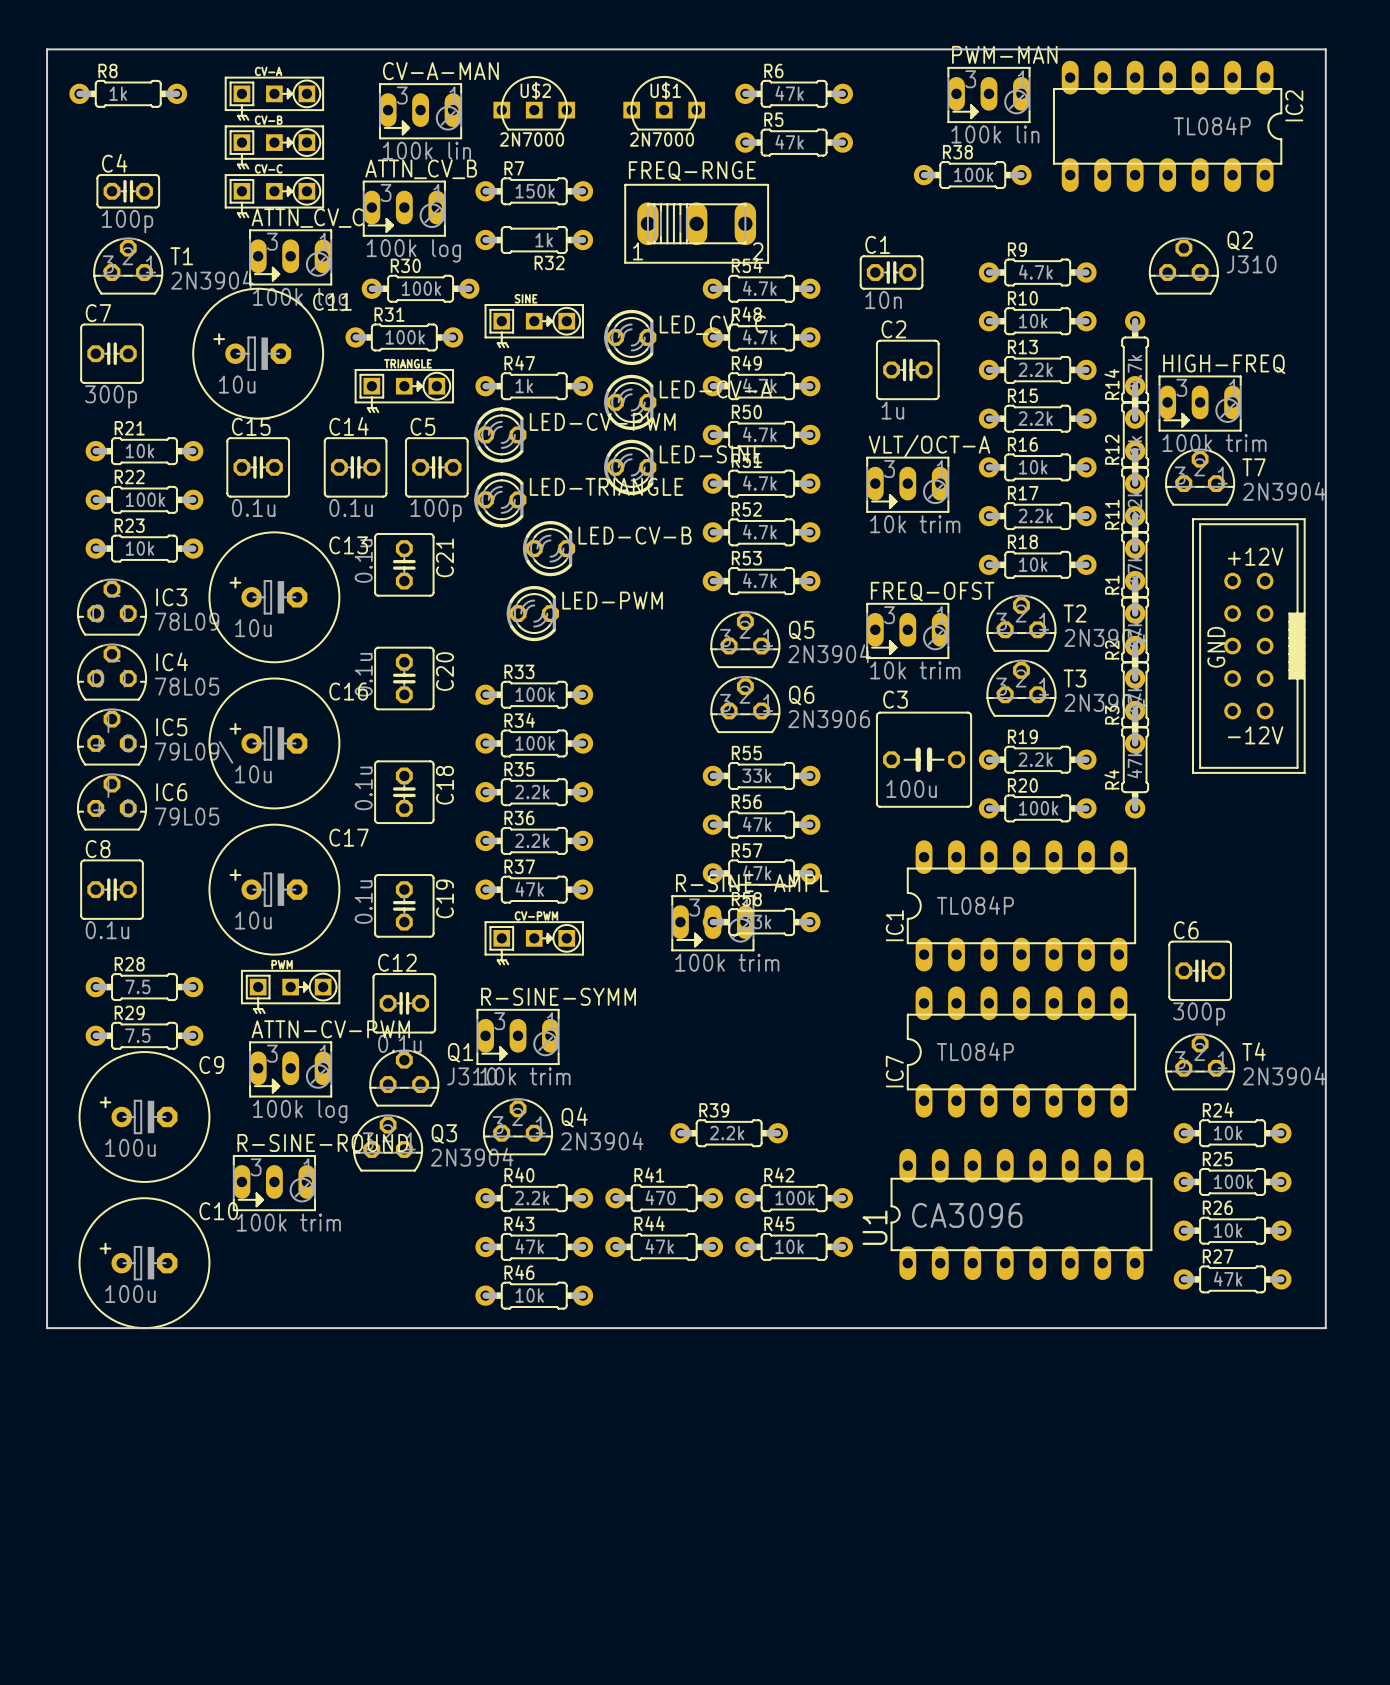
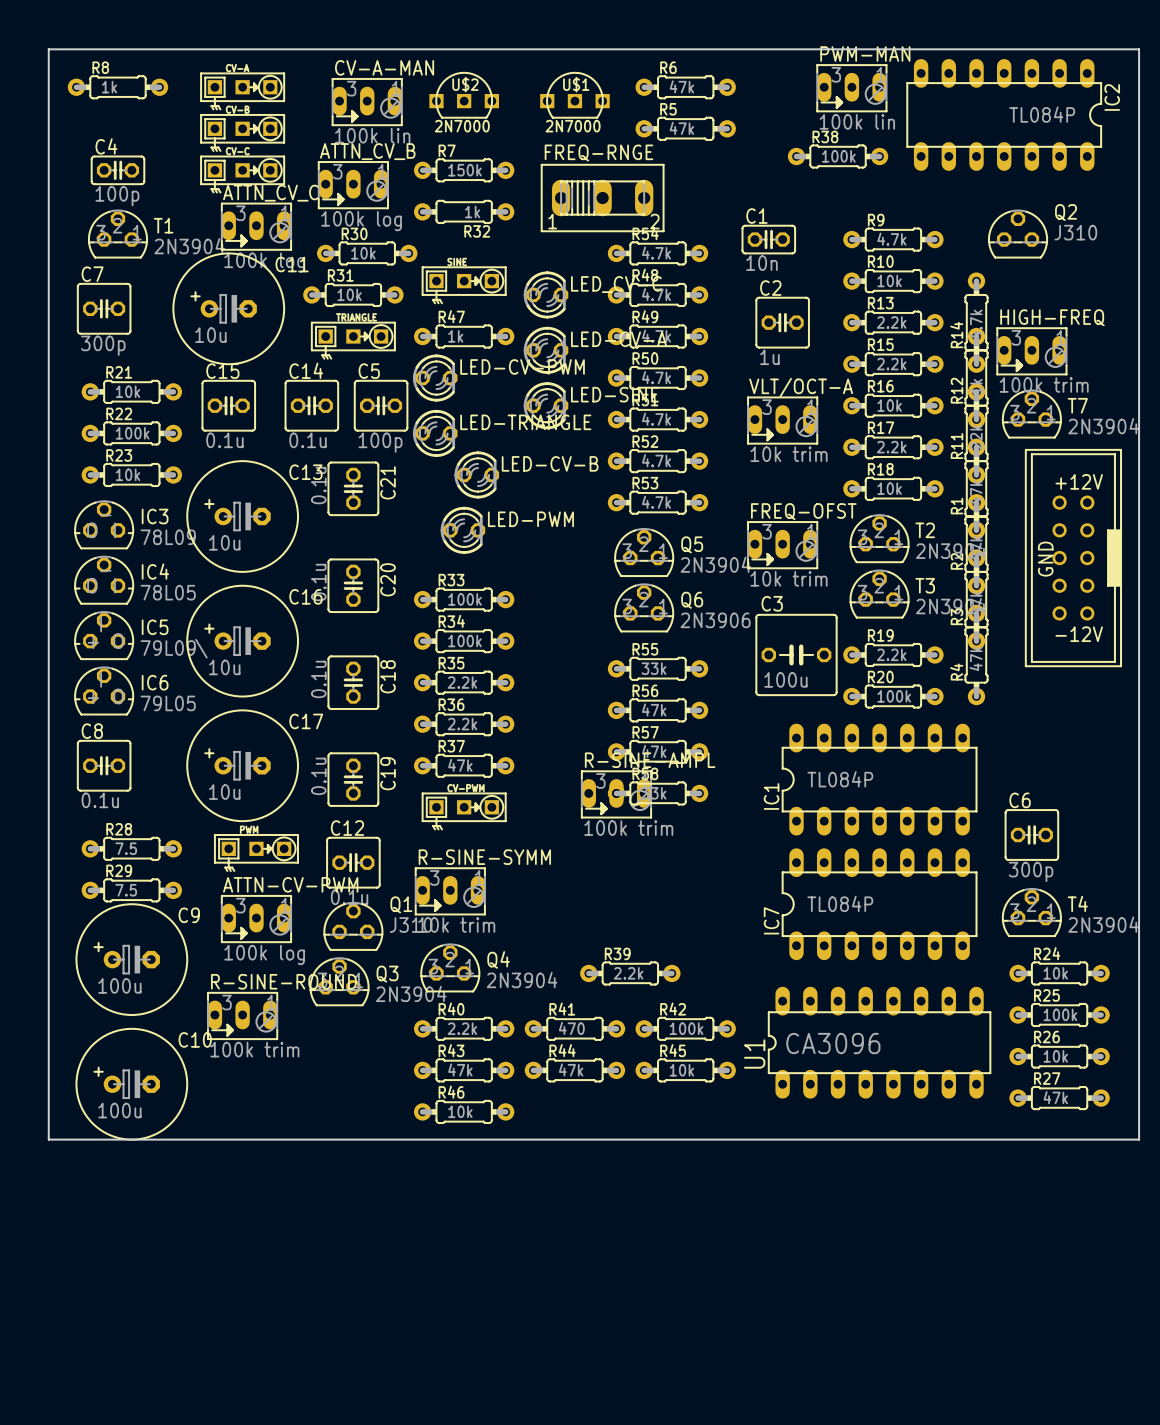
R30 value: 100k (421, 288) -> 10k (363, 253)
R31 value: 100k (405, 337) -> 10k (349, 294)

